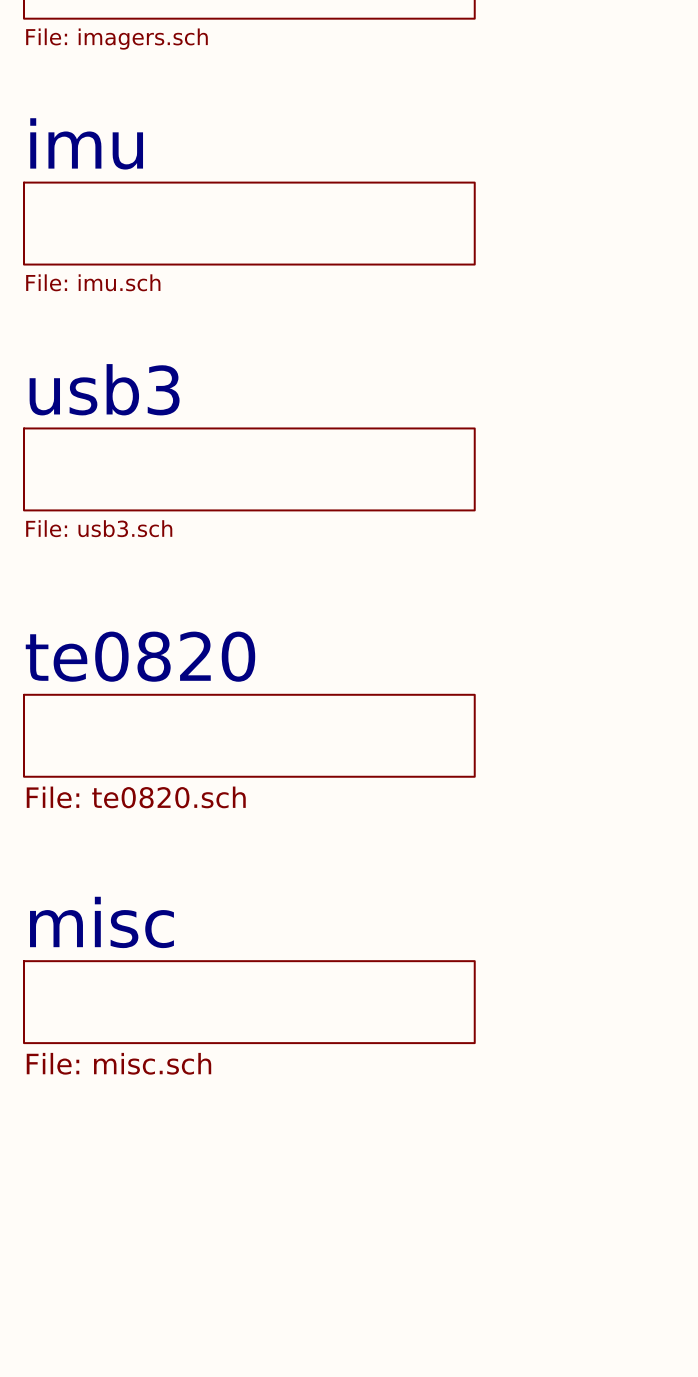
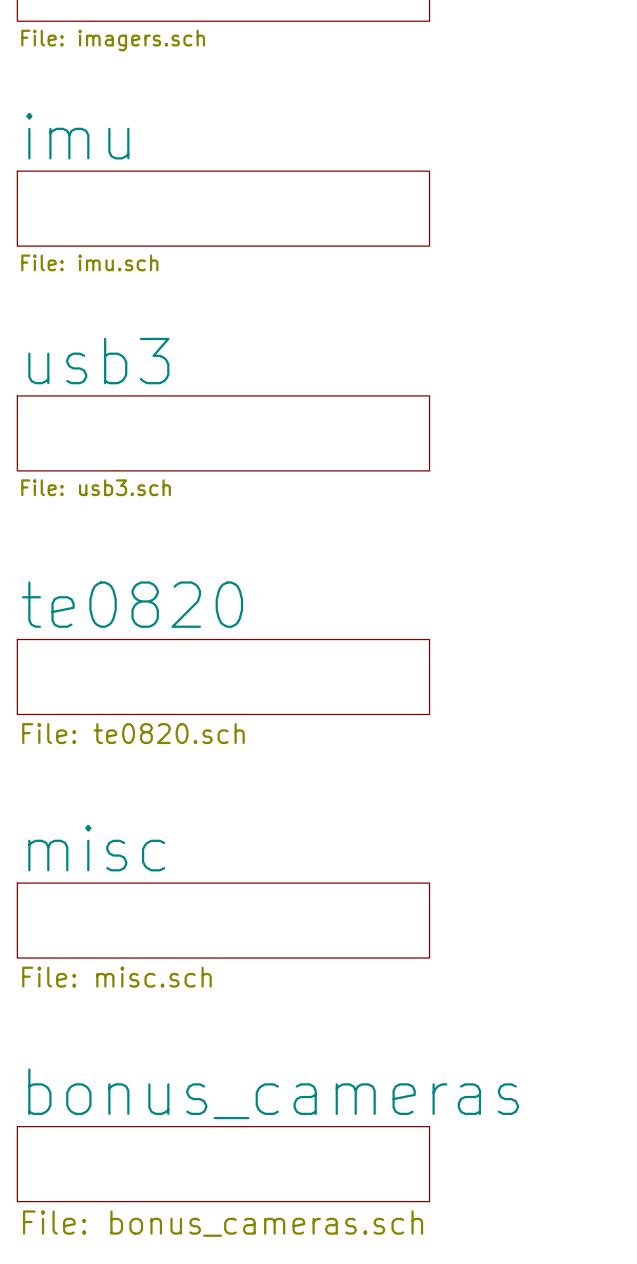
sheet bonus_cameras: none -> File: bonus_cameras.sch (223, 1164)

